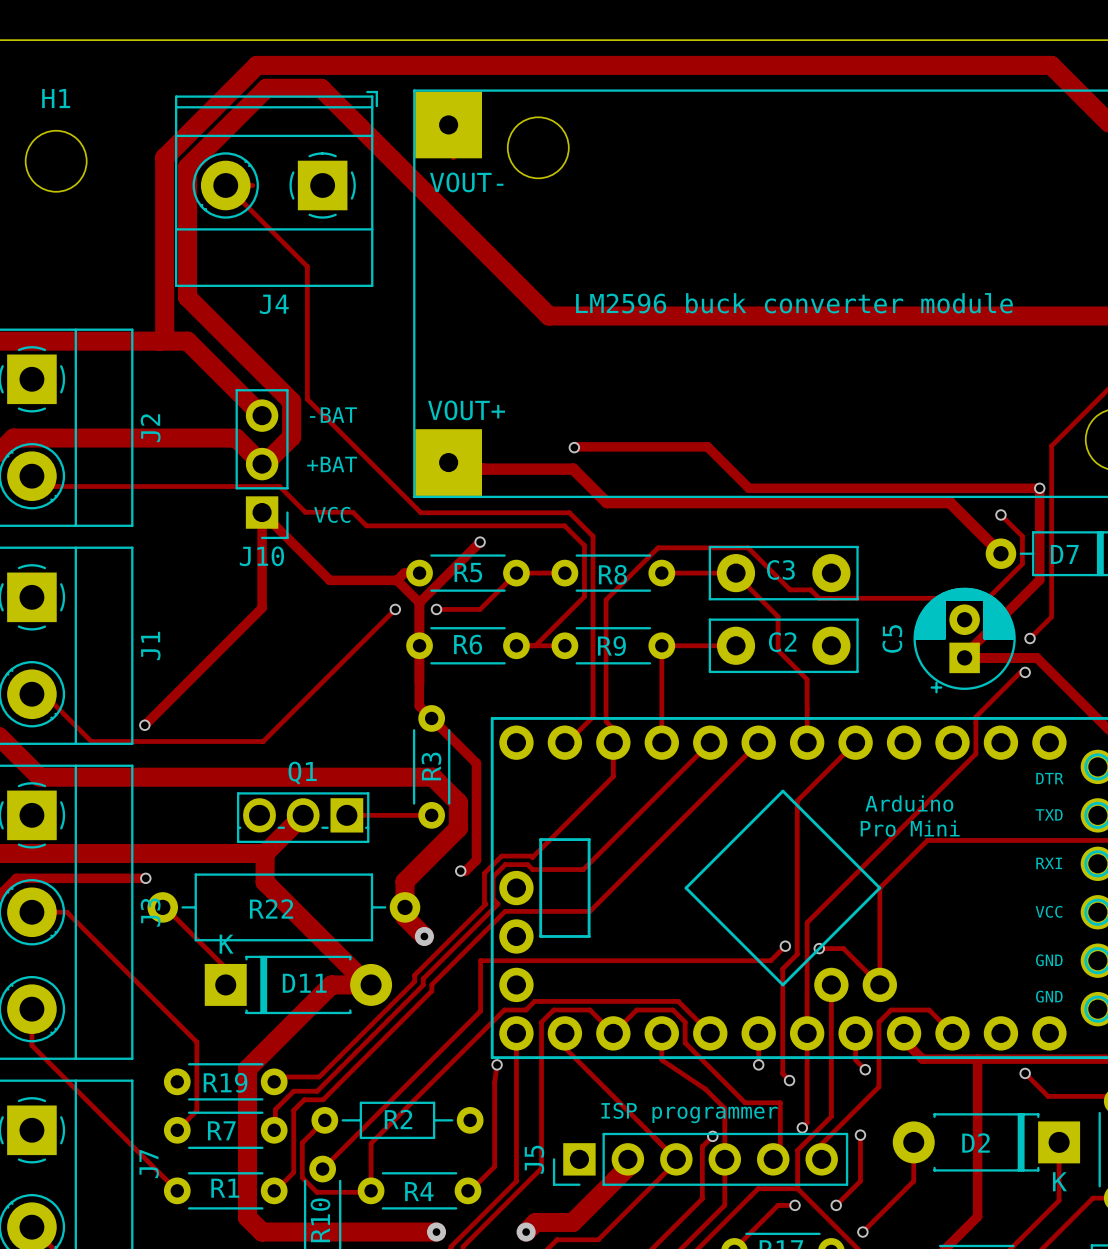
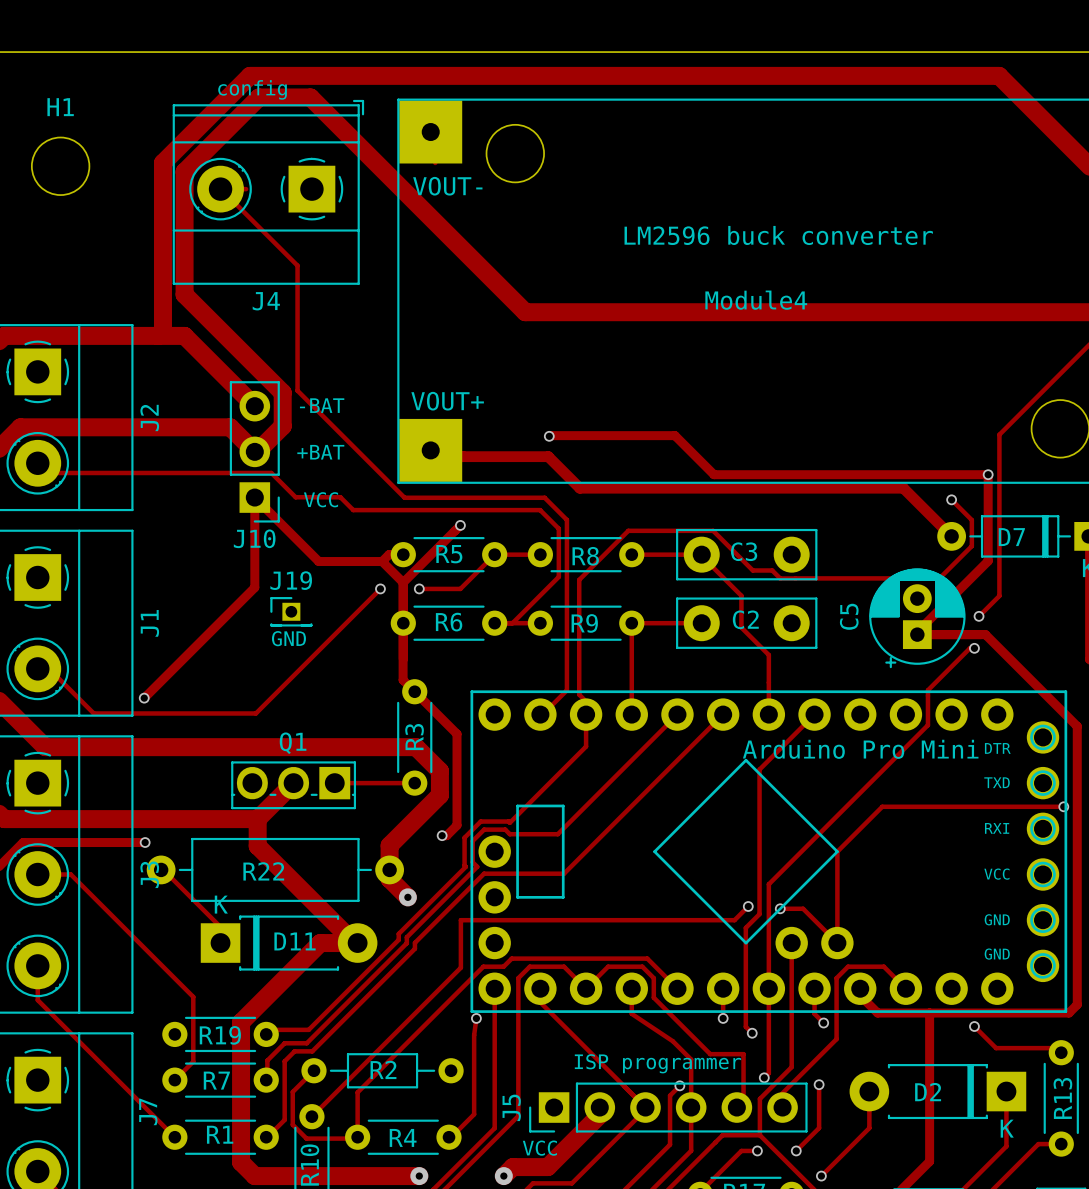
text: none -> config (252, 89)
LM2596 buck converter module text: none -> LM2596 buck converter (778, 235)
LM2596 buck converter module name: LM2596 buck converter module (794, 303) -> Module4 (756, 300)
J19: none -> (291, 611)
text: none -> GND (288, 638)
part text: none -> Arduino Pro Mini (860, 749)
text: Arduino (909, 803) -> none
text: Pro Mini (910, 828) -> none
text: none -> VCC (539, 1148)

